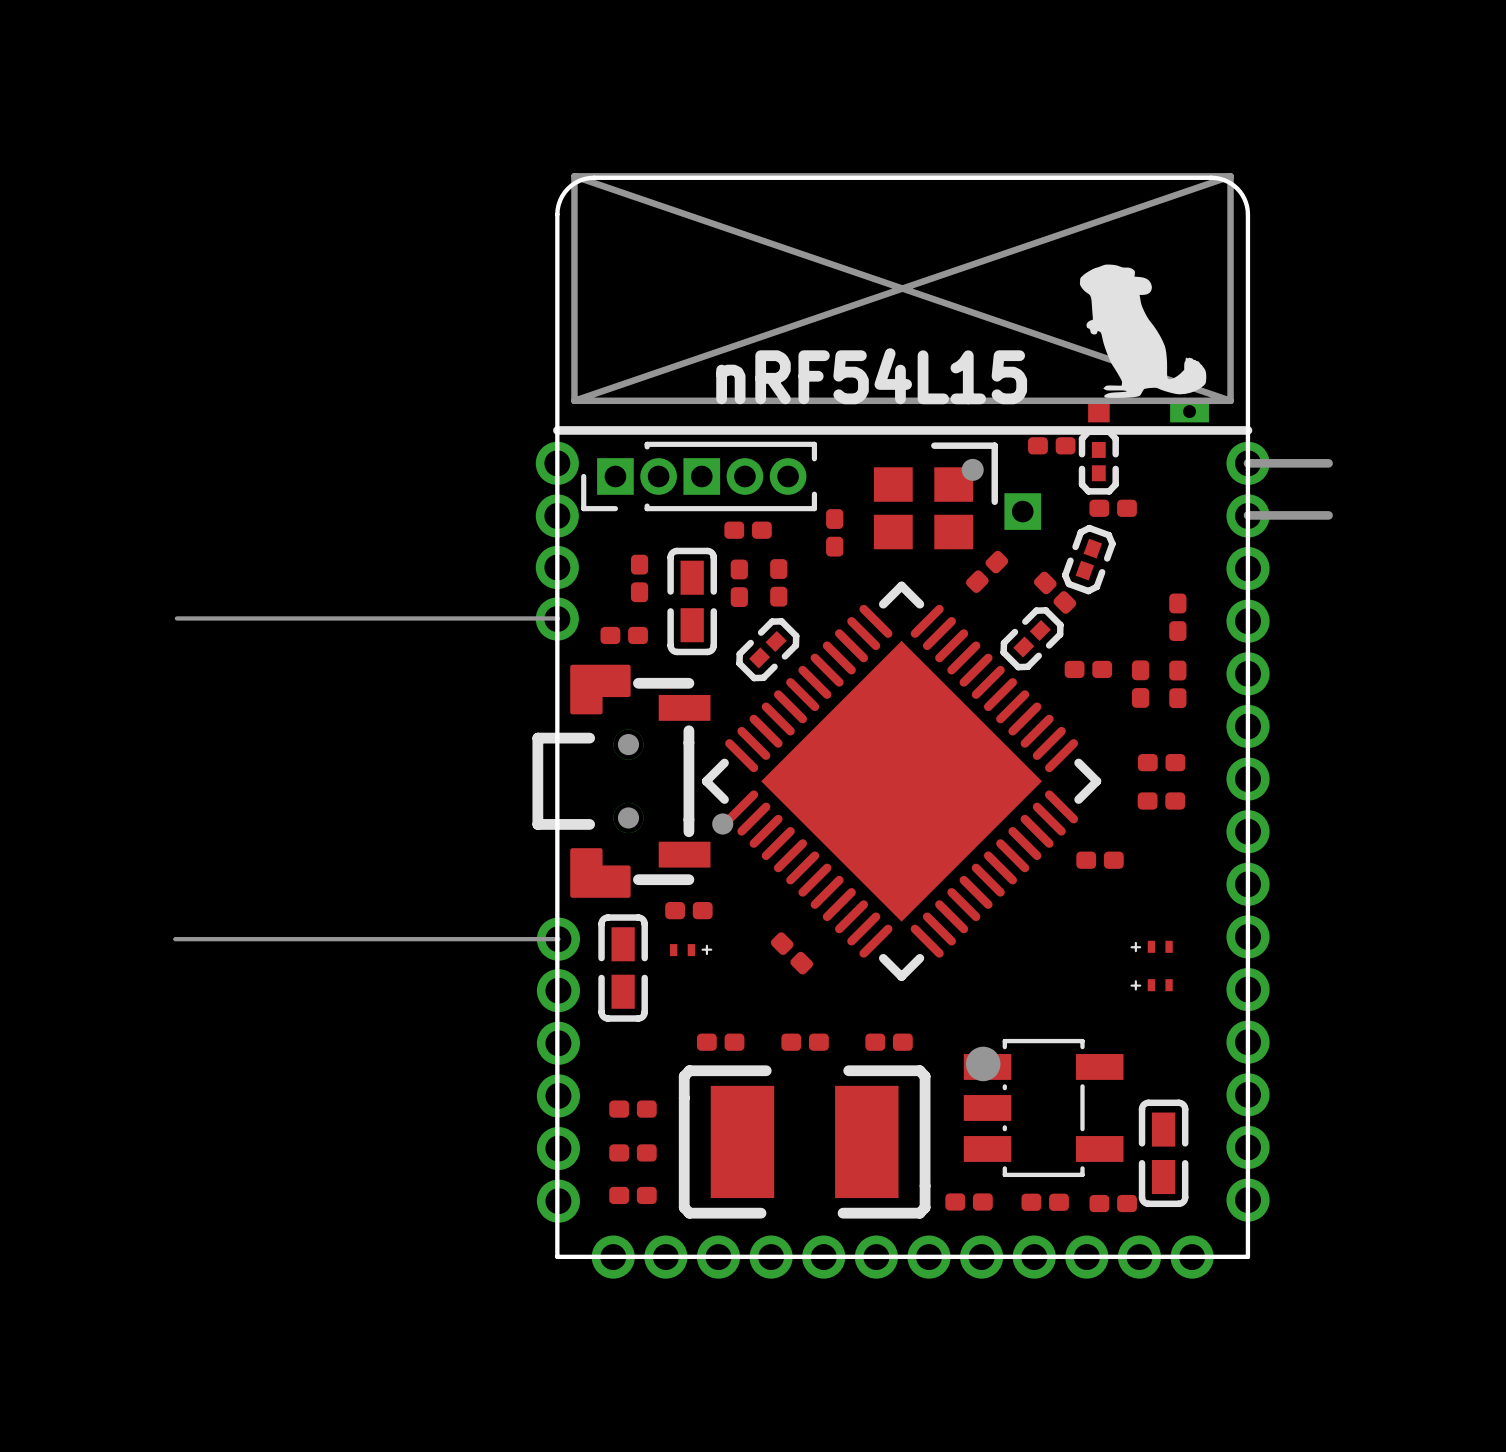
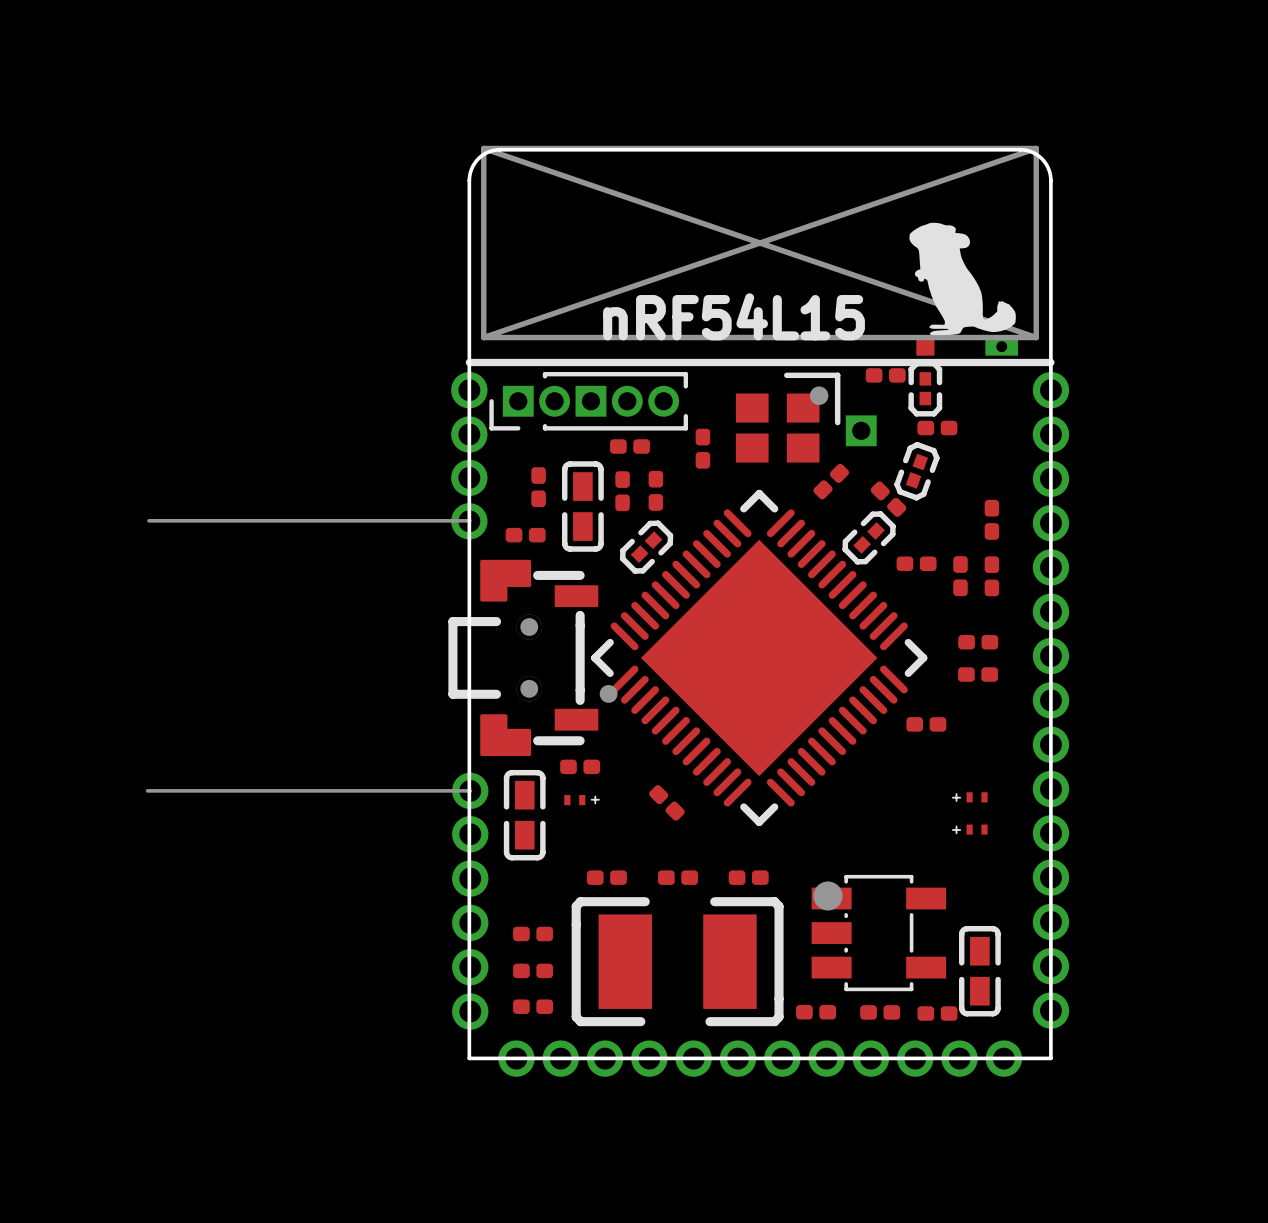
line: (1247, 463) (1328, 463) -> none
line: (1248, 515) (1328, 515) -> none

